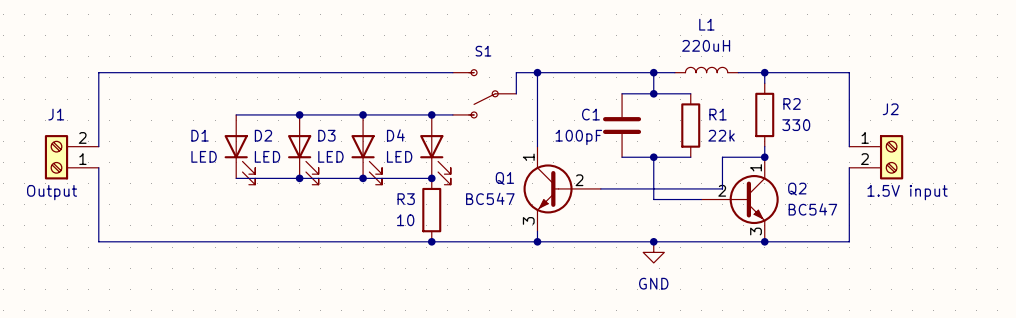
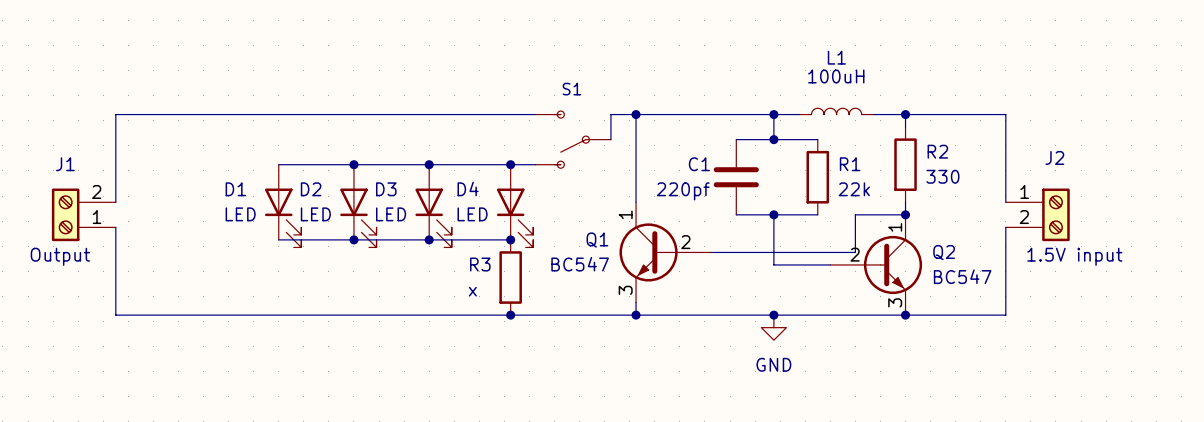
L1 value: 220uH (706, 45) -> 100uH (836, 76)
C1 value: 100pF (578, 137) -> 220pf (683, 191)
R3 value: 10 (405, 220) -> x (472, 291)

